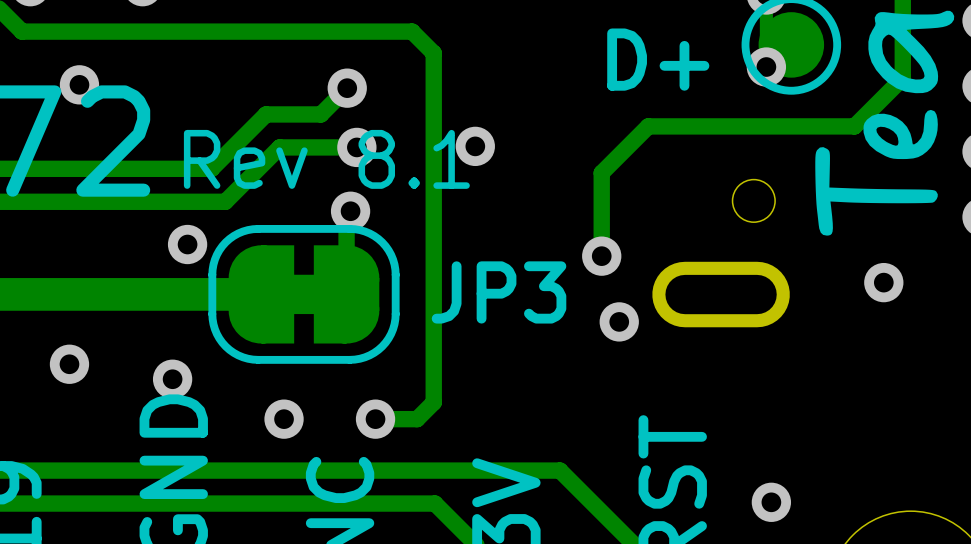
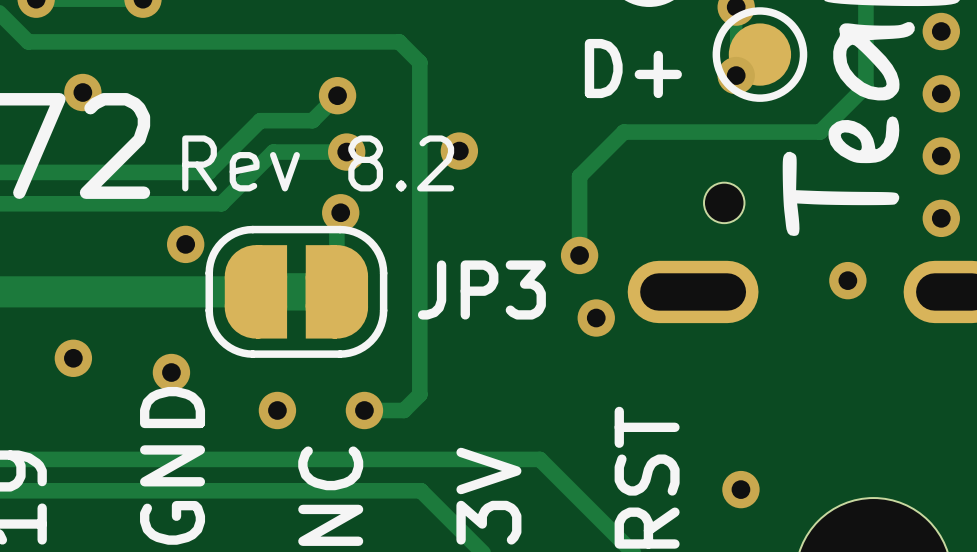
text: Rev 8.1 (326, 159) -> Rev 8.2 (318, 163)

